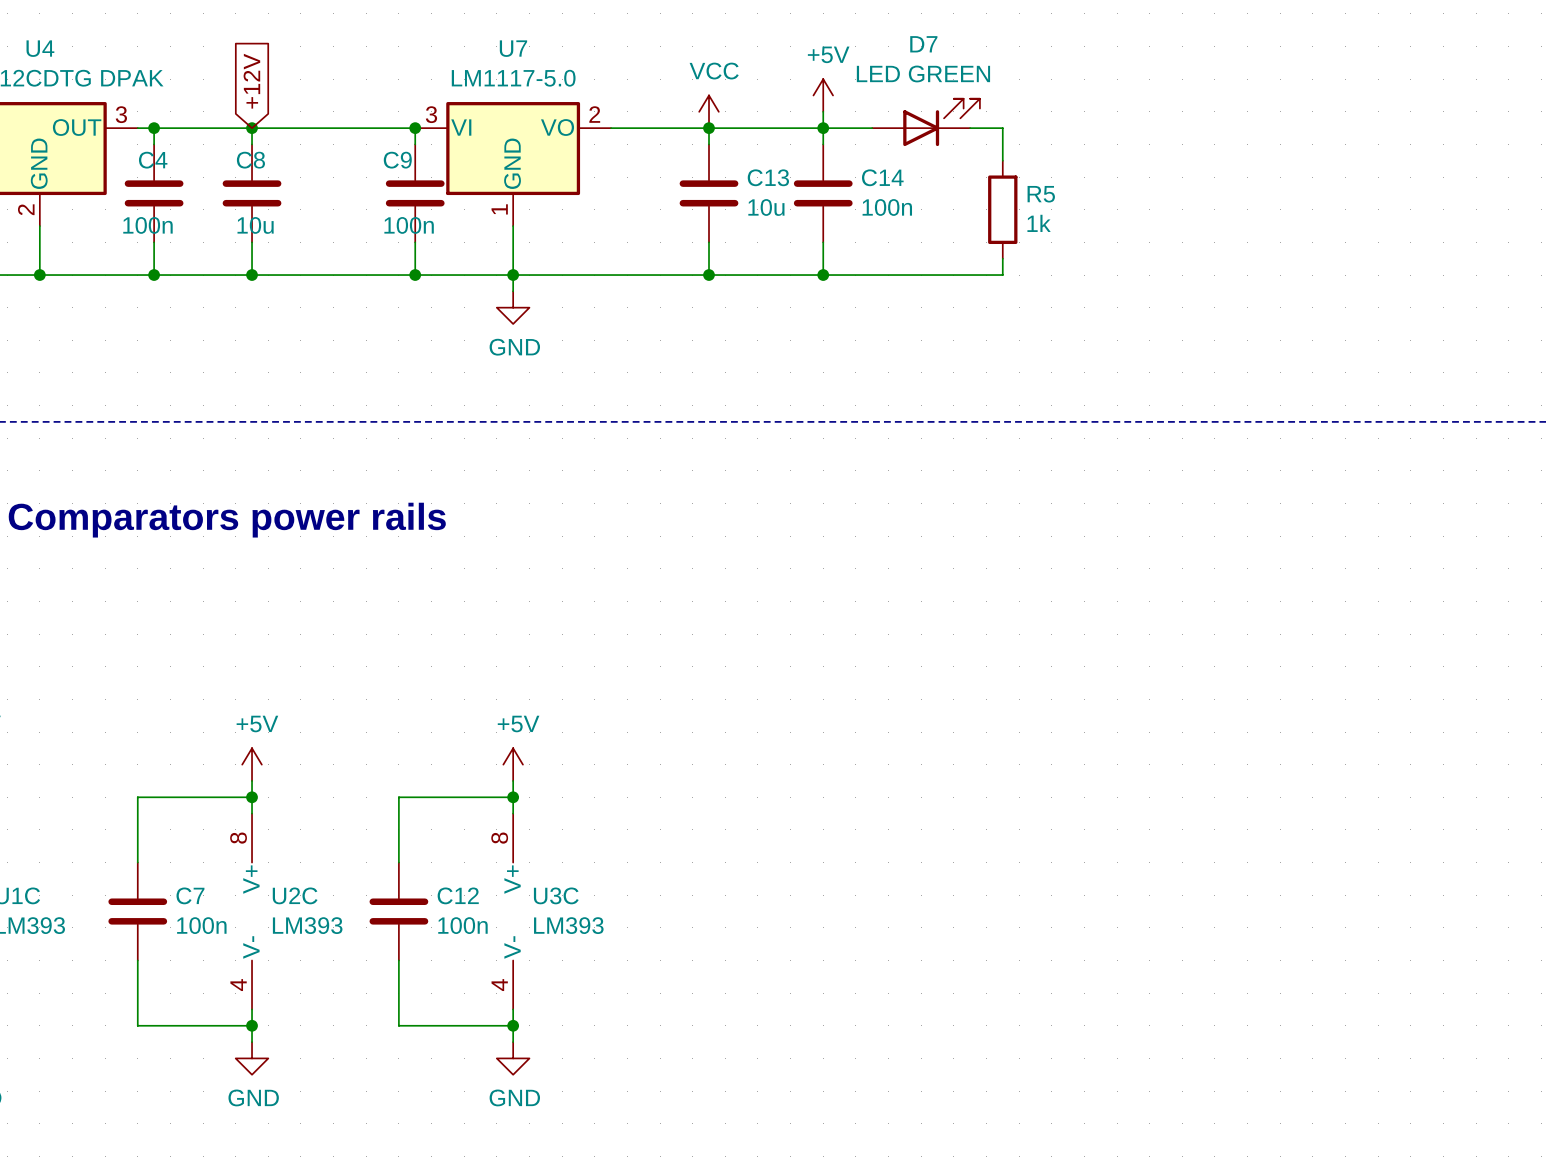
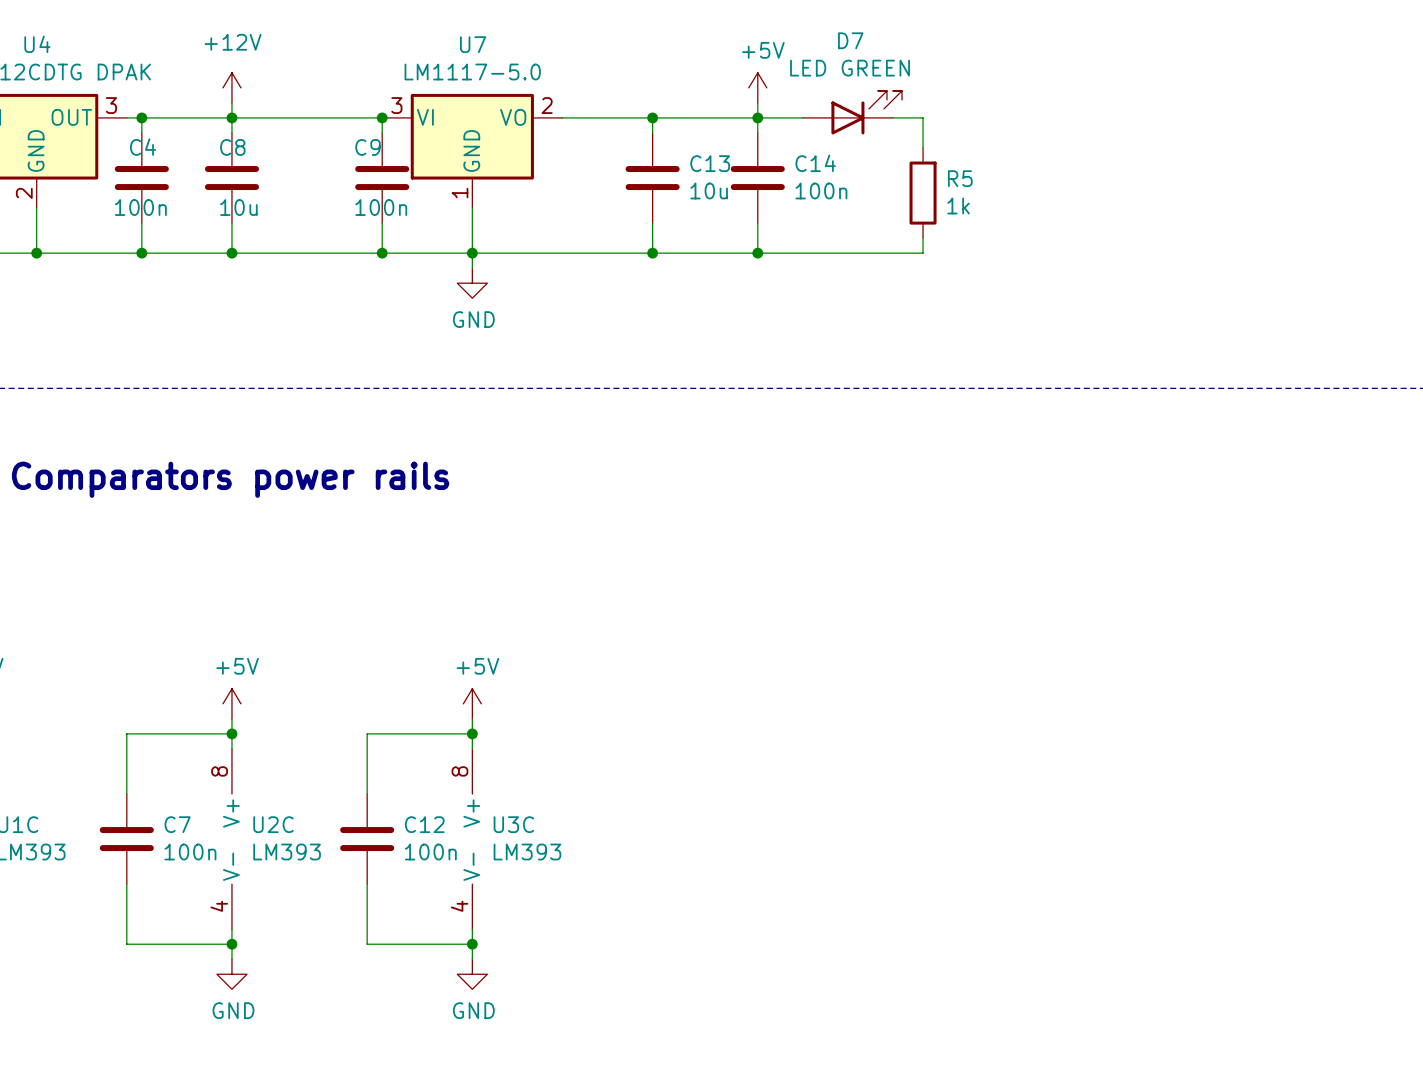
global label: +12V (251, 81) -> none
power symbol: none -> +12V (231, 87)
wire: none -> (231, 102) (231, 117)
power symbol: VCC (709, 111) -> none

